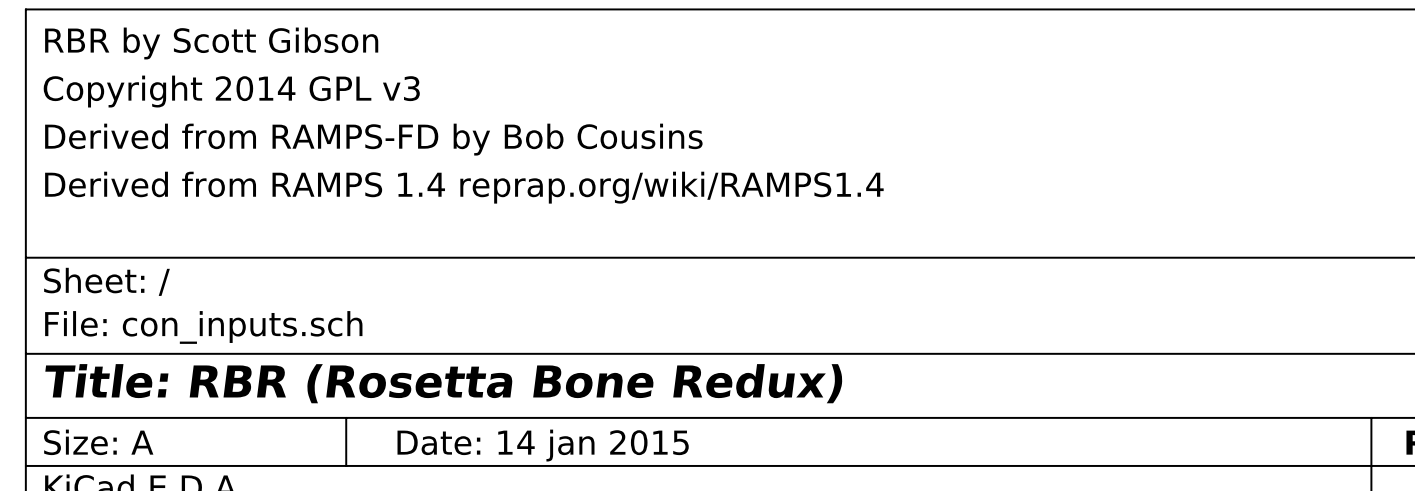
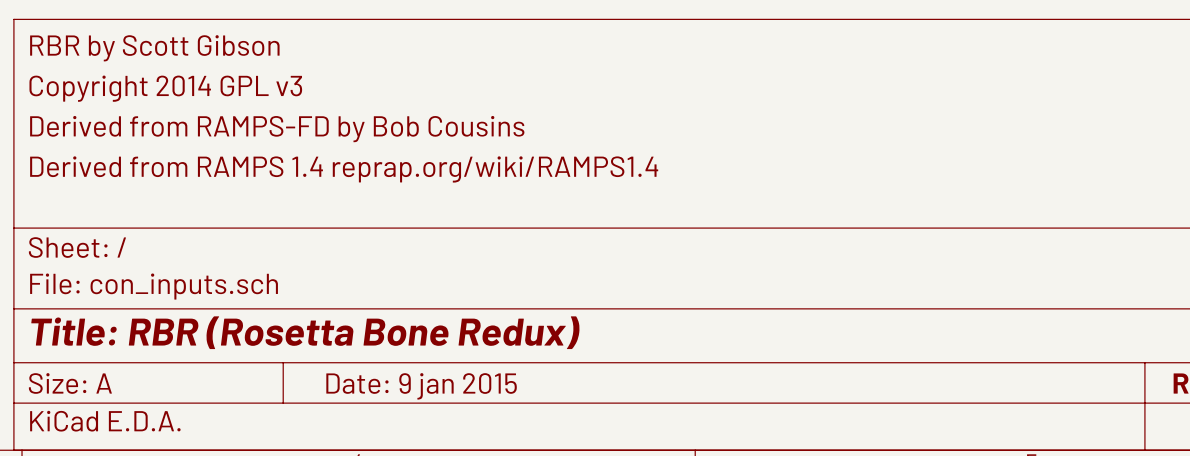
title block: Date: 14 jan 2015 (543, 445) -> Date: 9 jan 2015 (421, 386)

